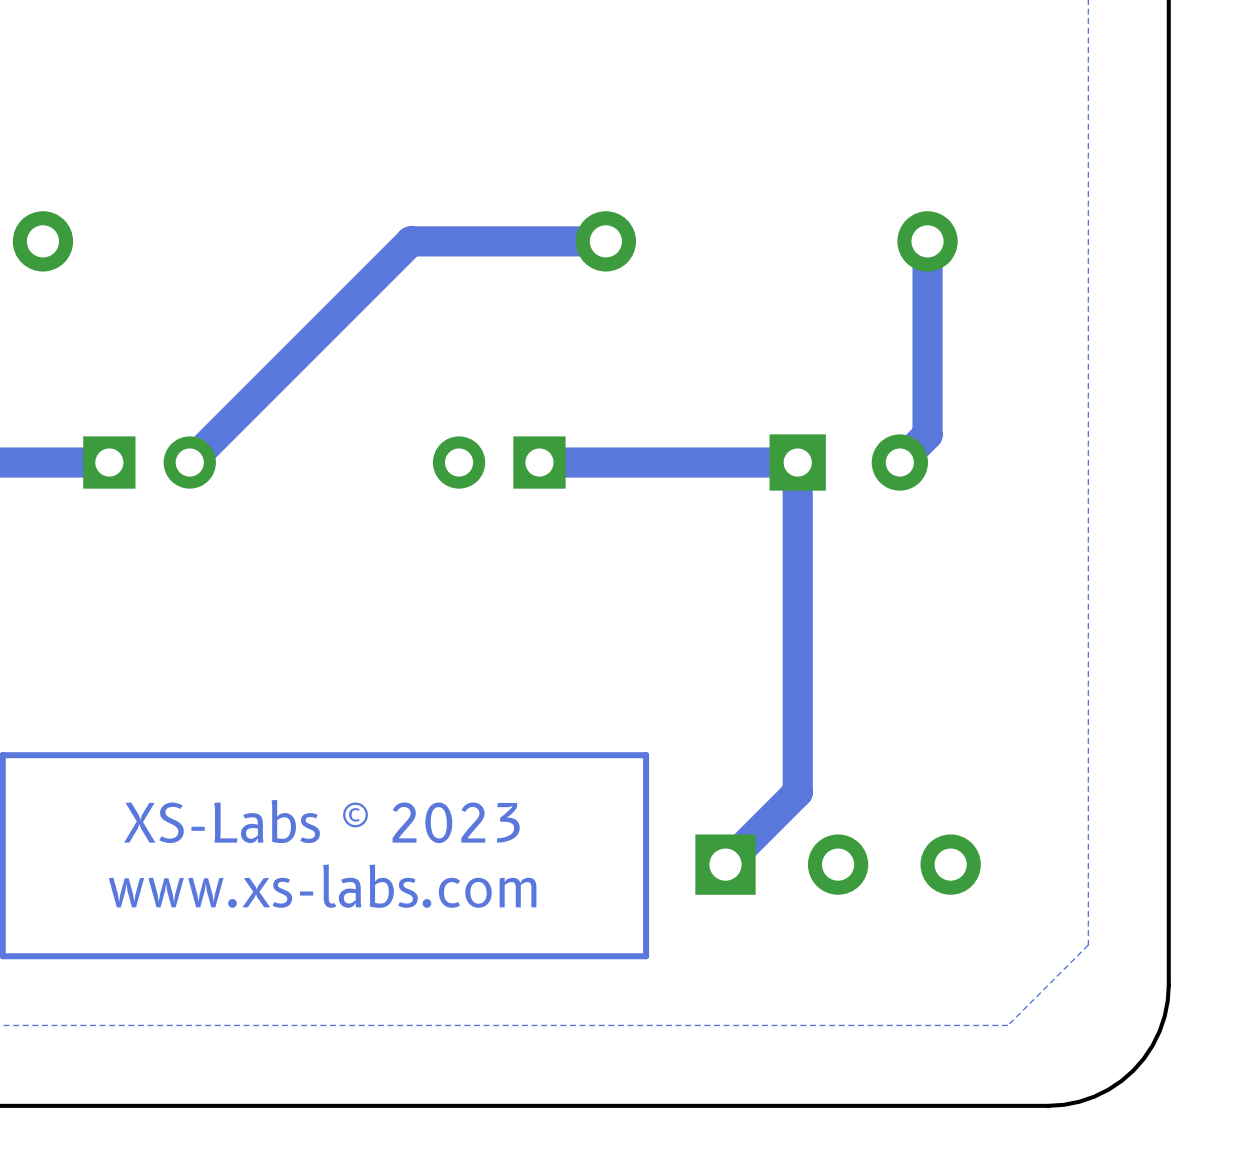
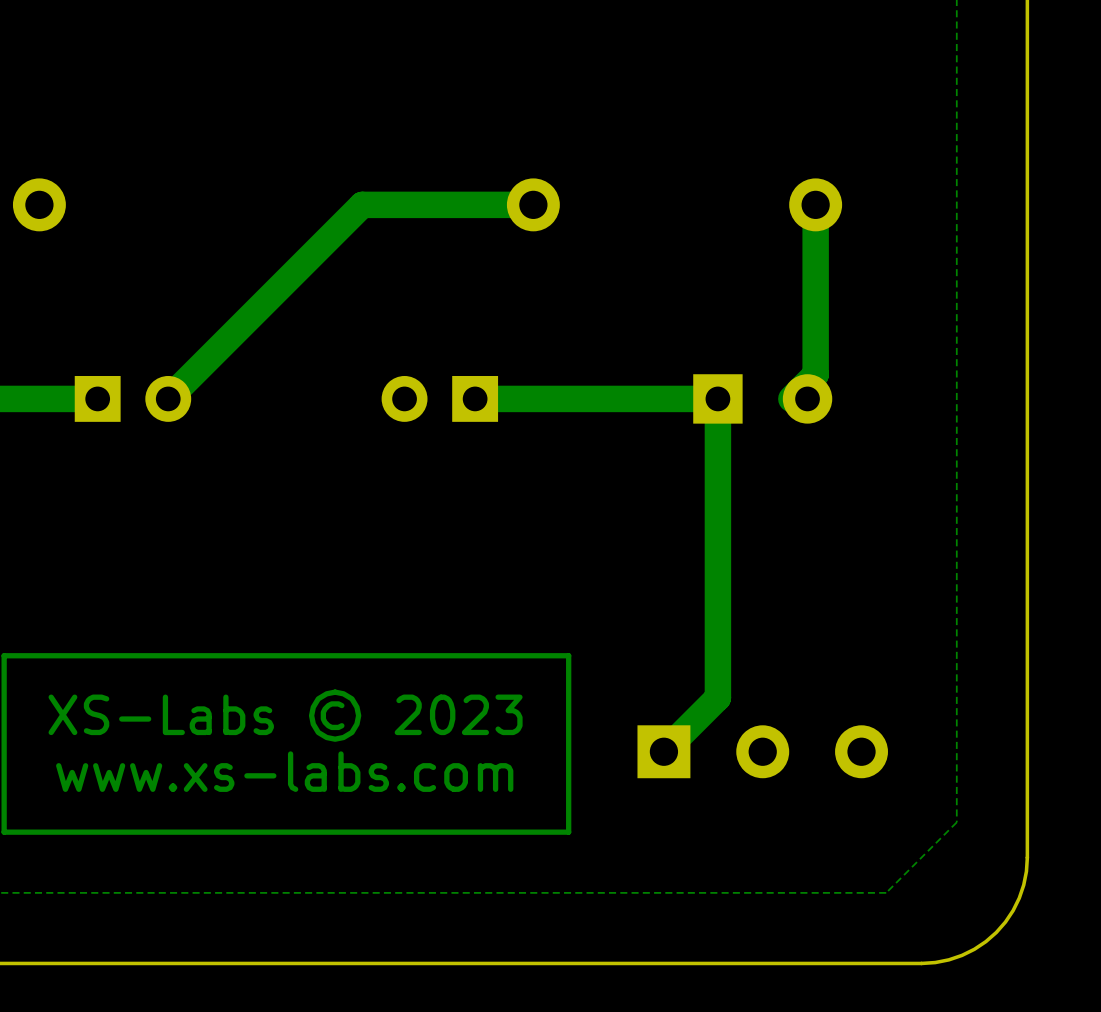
track: (797, 462) (797, 792) (725, 864) -> (701, 398) (717, 398) (717, 697) (663, 751)
part position: (848, 462) -> (762, 398)
part position: (838, 864) -> (762, 751)

